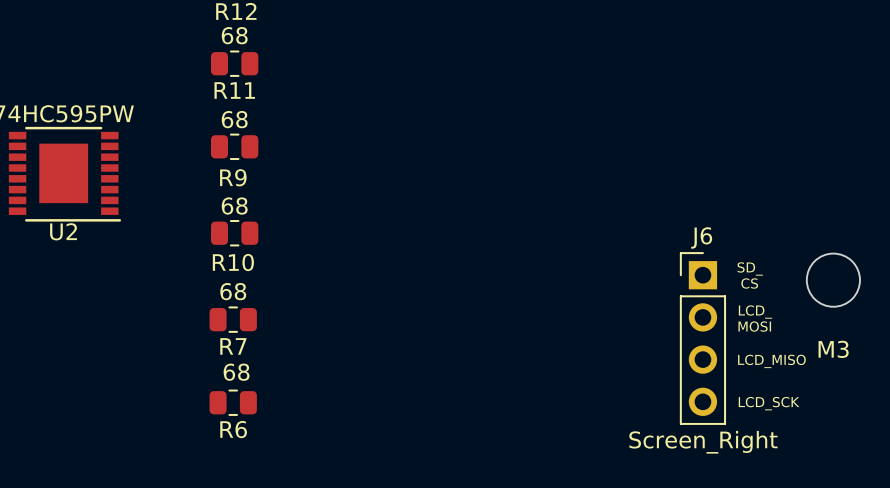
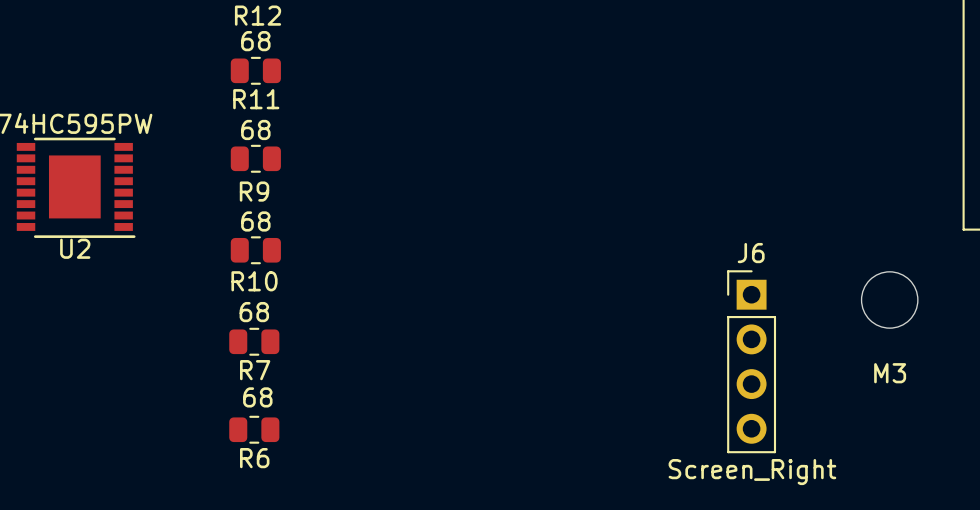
text: SD_ (750, 268) -> none
text: CS (749, 283) -> none
text: LCD_ (755, 312) -> none
text: MOSI (754, 326) -> none
text: LCD_MISO (771, 361) -> none
text: LCD_SCK (769, 403) -> none

